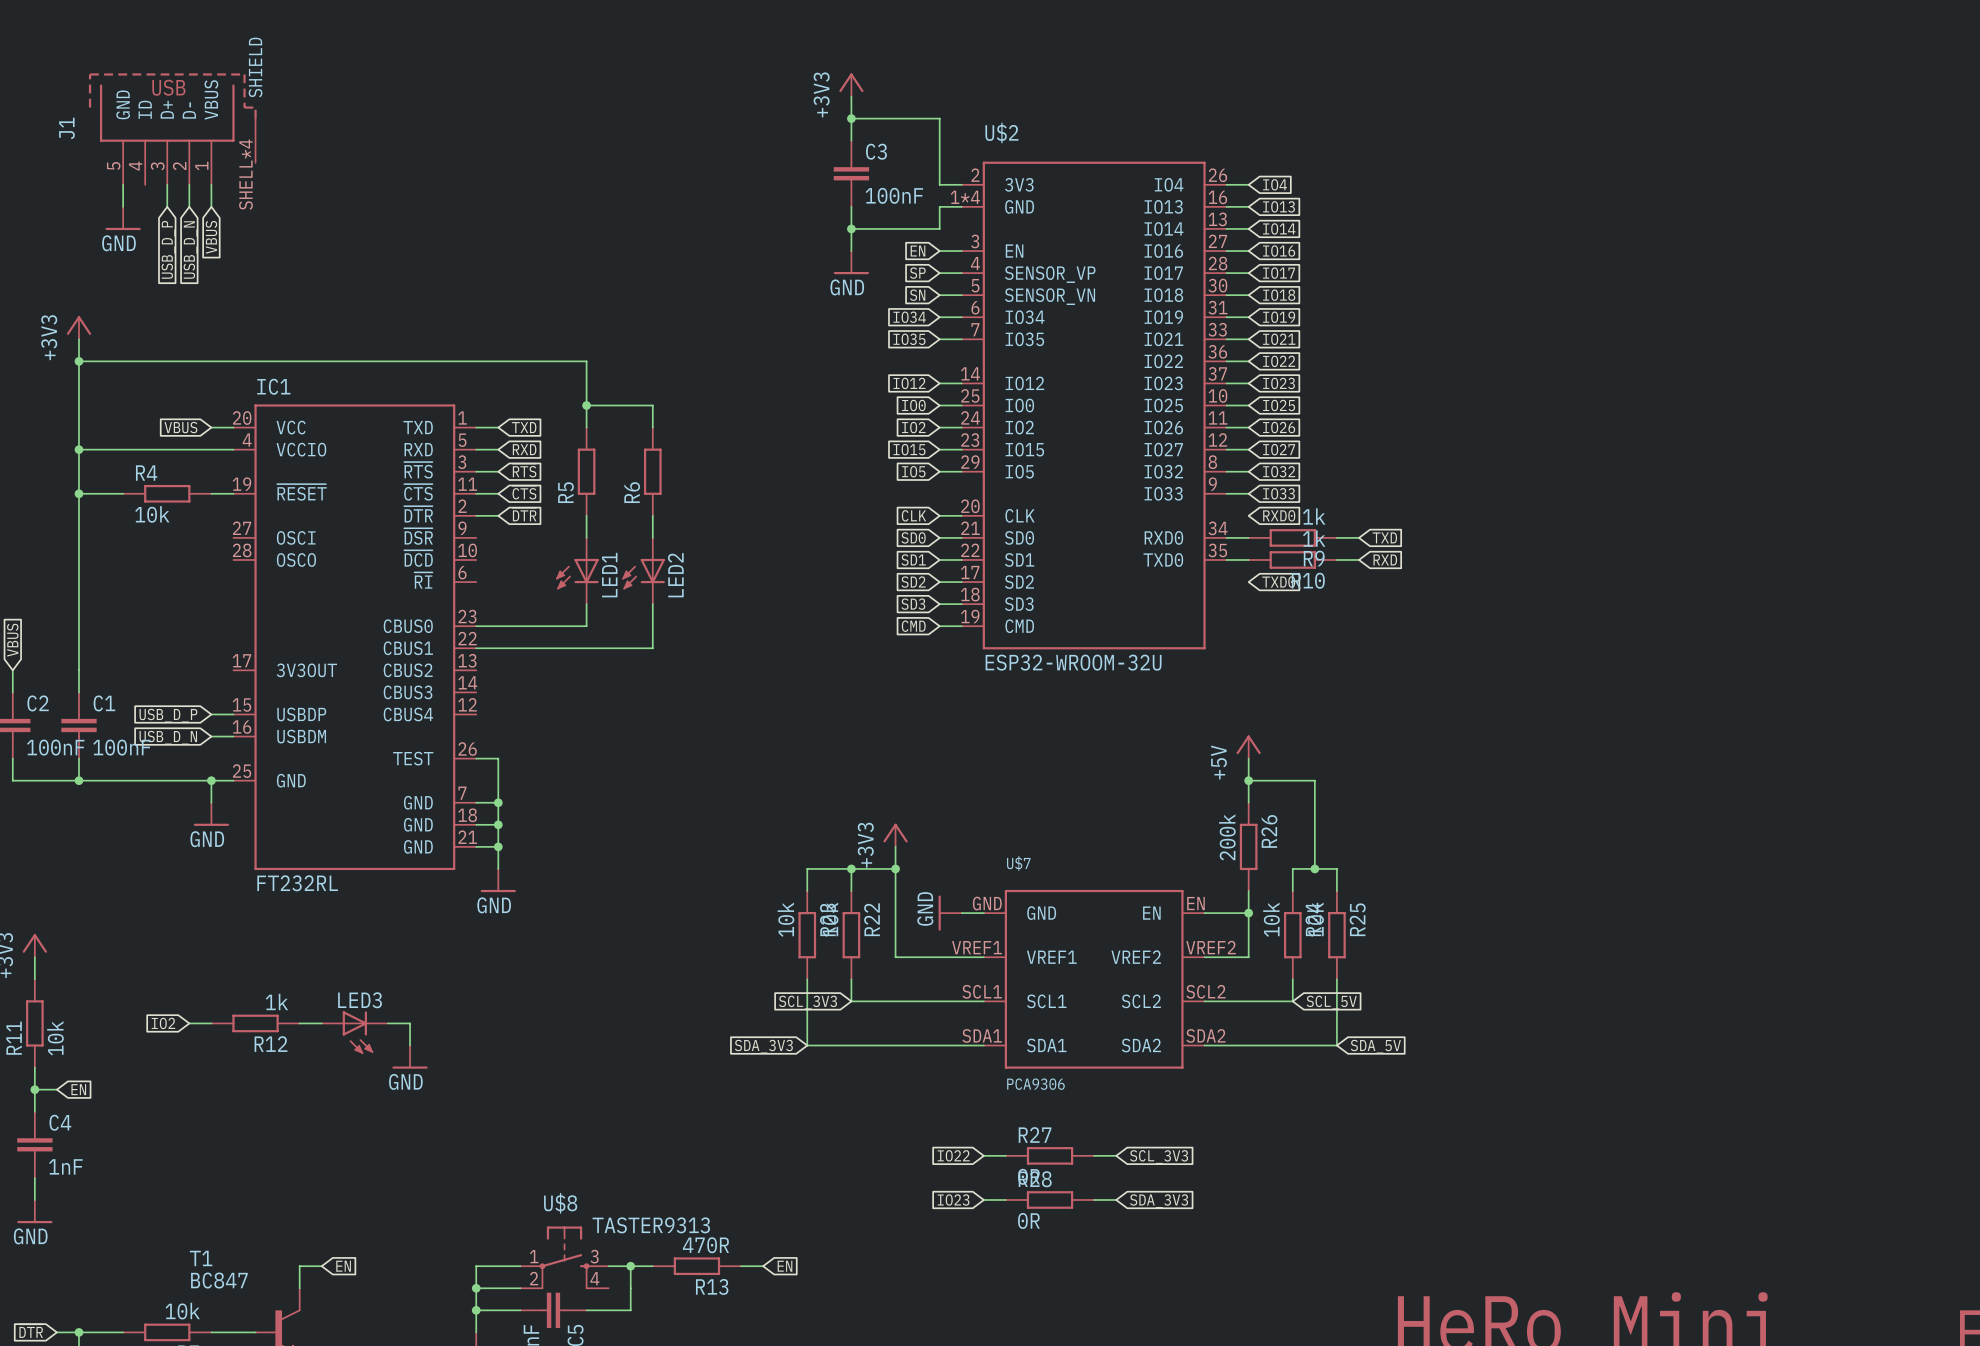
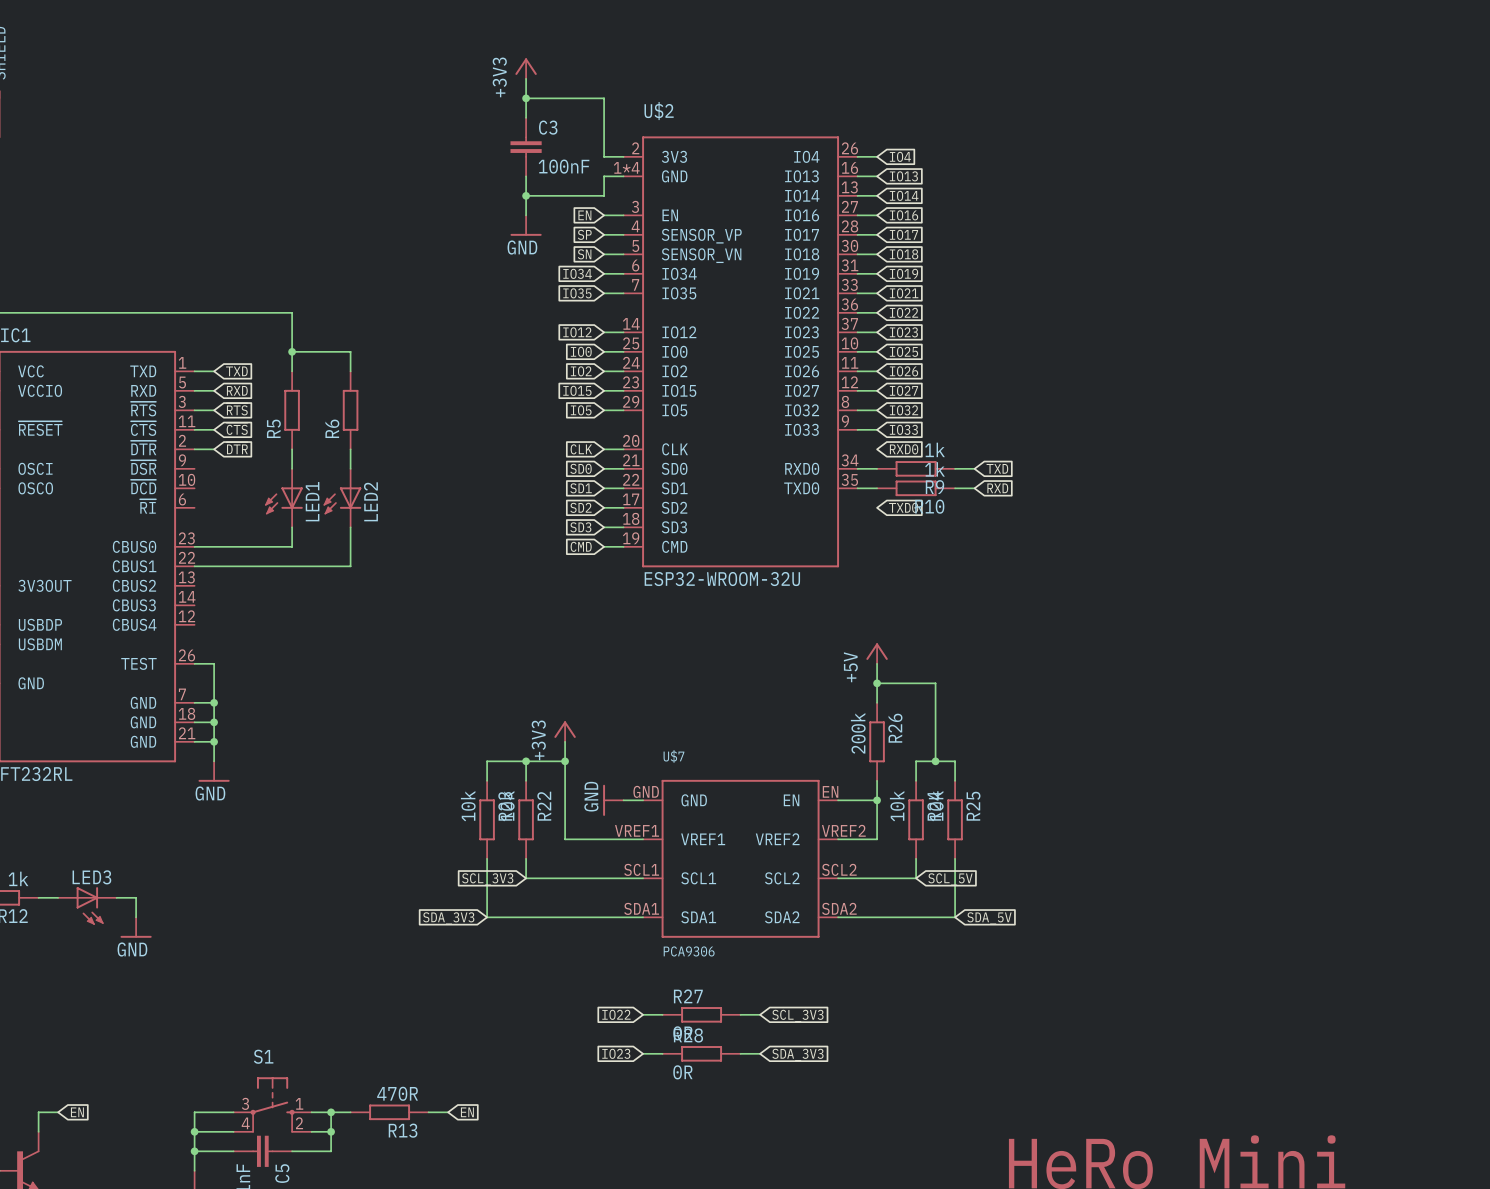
U$8 name: U$8 (560, 1203) -> S1 (263, 1056)
U$8 value: TASTER9313 (651, 1225) -> none
U$8 pin number: 1 (534, 1256) -> 3 (245, 1103)
U$8 pin number: 3 (594, 1256) -> 1 (299, 1103)
U$8 pin number: 2 (534, 1278) -> 4 (245, 1123)
U$8 pin number: 4 (594, 1278) -> 2 (299, 1123)
wire: none -> (311, 1131) (331, 1131)
junction: none -> (331, 1131)

